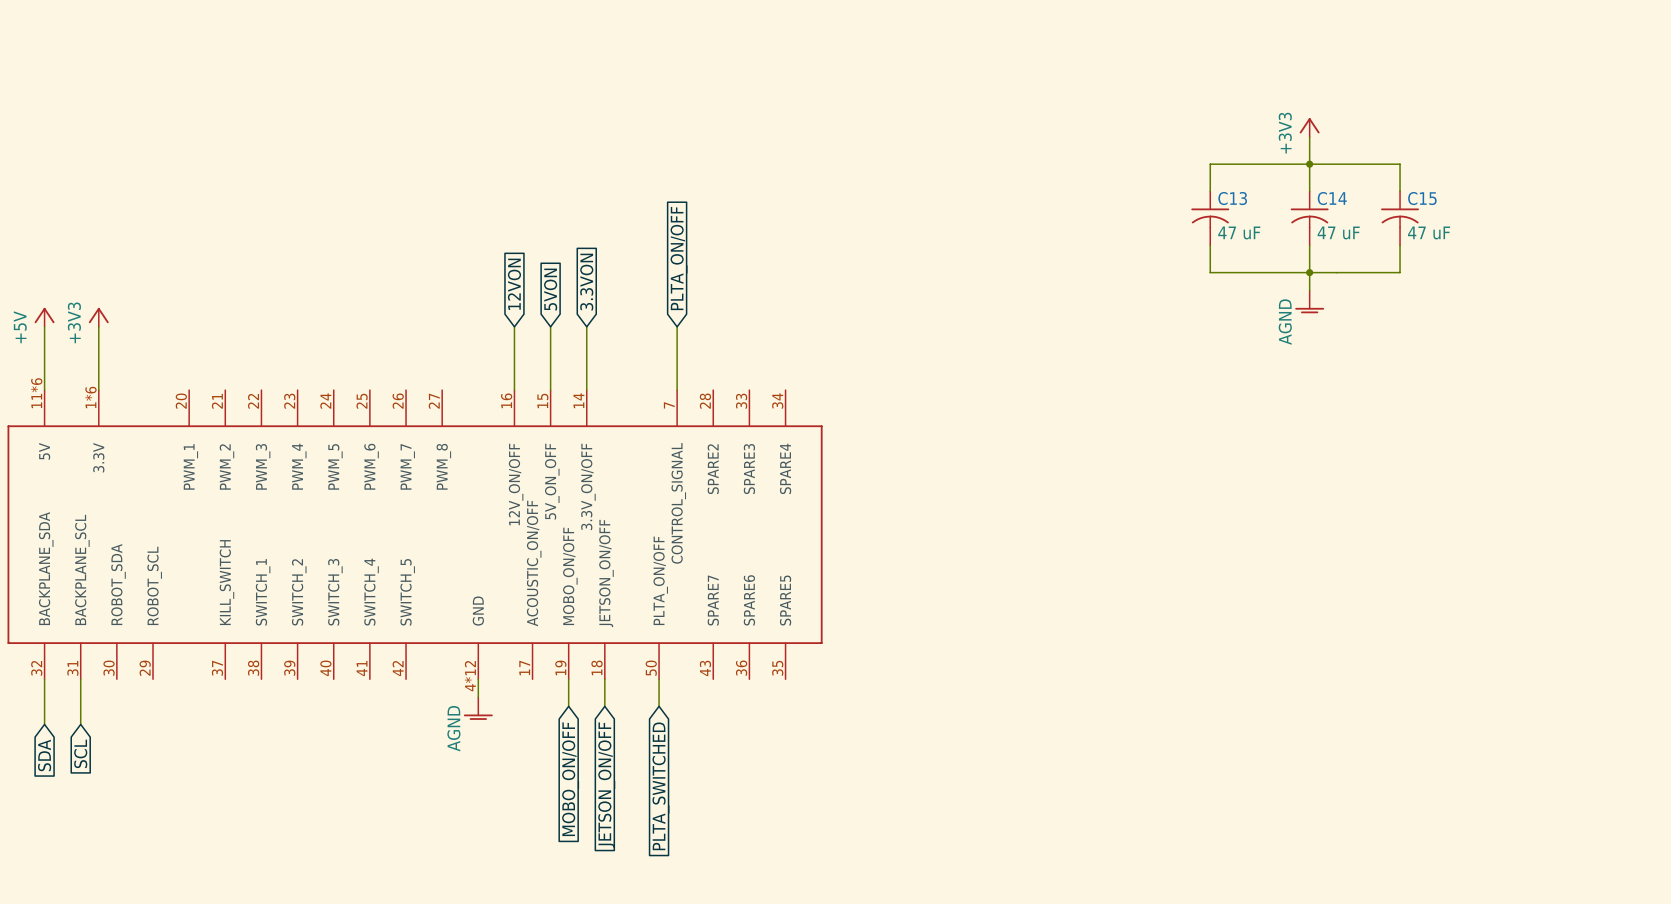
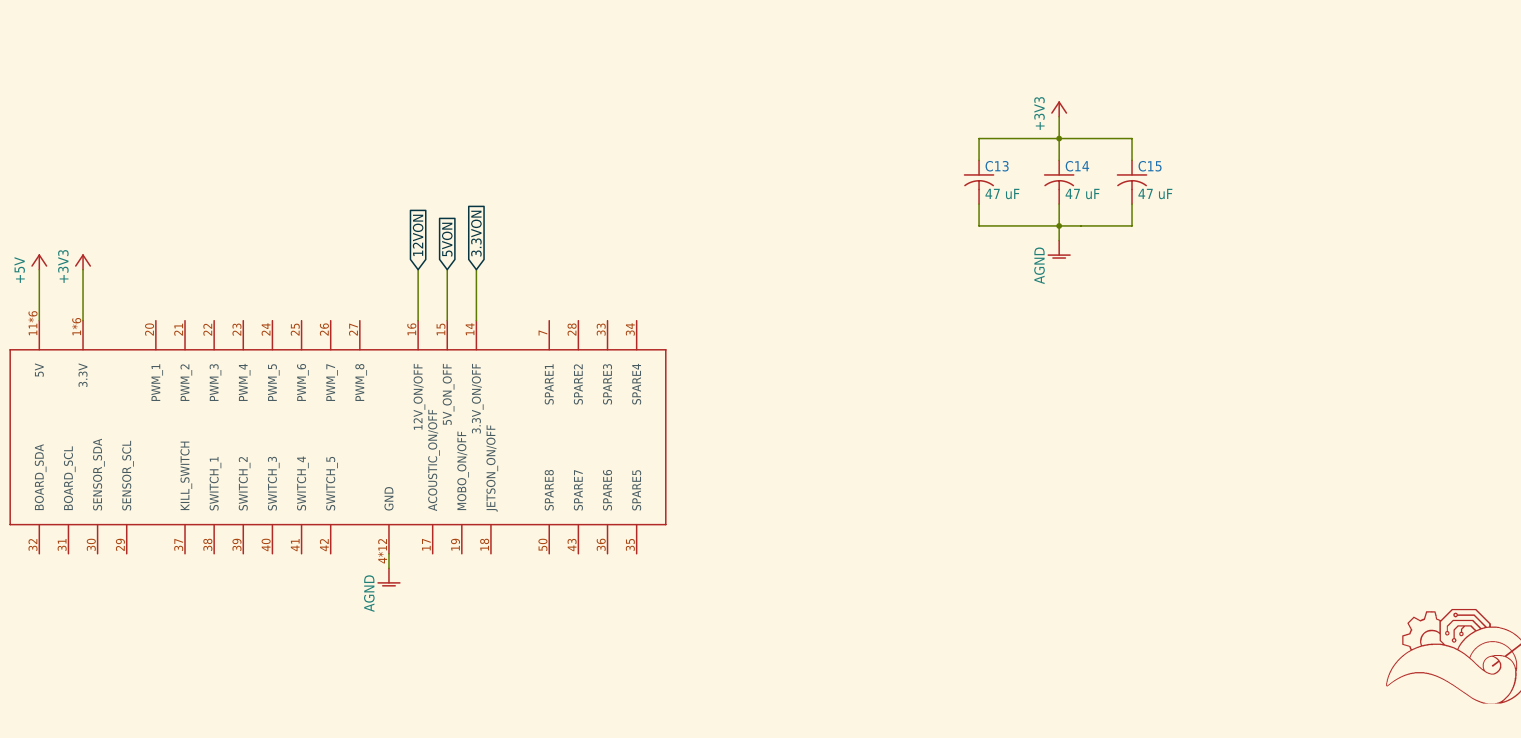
global label: PLTA_ON/OFF (679, 258) -> none
wire: (677, 326) (677, 390) -> none
part symbol: [7, 390, 823, 680] -> [9, 320, 667, 554]
wire: (44, 679) (44, 724) -> none
wire: (80, 679) (80, 724) -> none
wire: (568, 679) (568, 706) -> none
wire: (604, 679) (604, 706) -> none
wire: (659, 679) (659, 706) -> none
global label: SCL (80, 753) -> none
global label: SDA (44, 755) -> none
global label: MOBO_ON/OFF (570, 779) -> none
global label: JETSON_ON/OFF (606, 785) -> none
global label: PLTA_SWITCHED (660, 786) -> none

